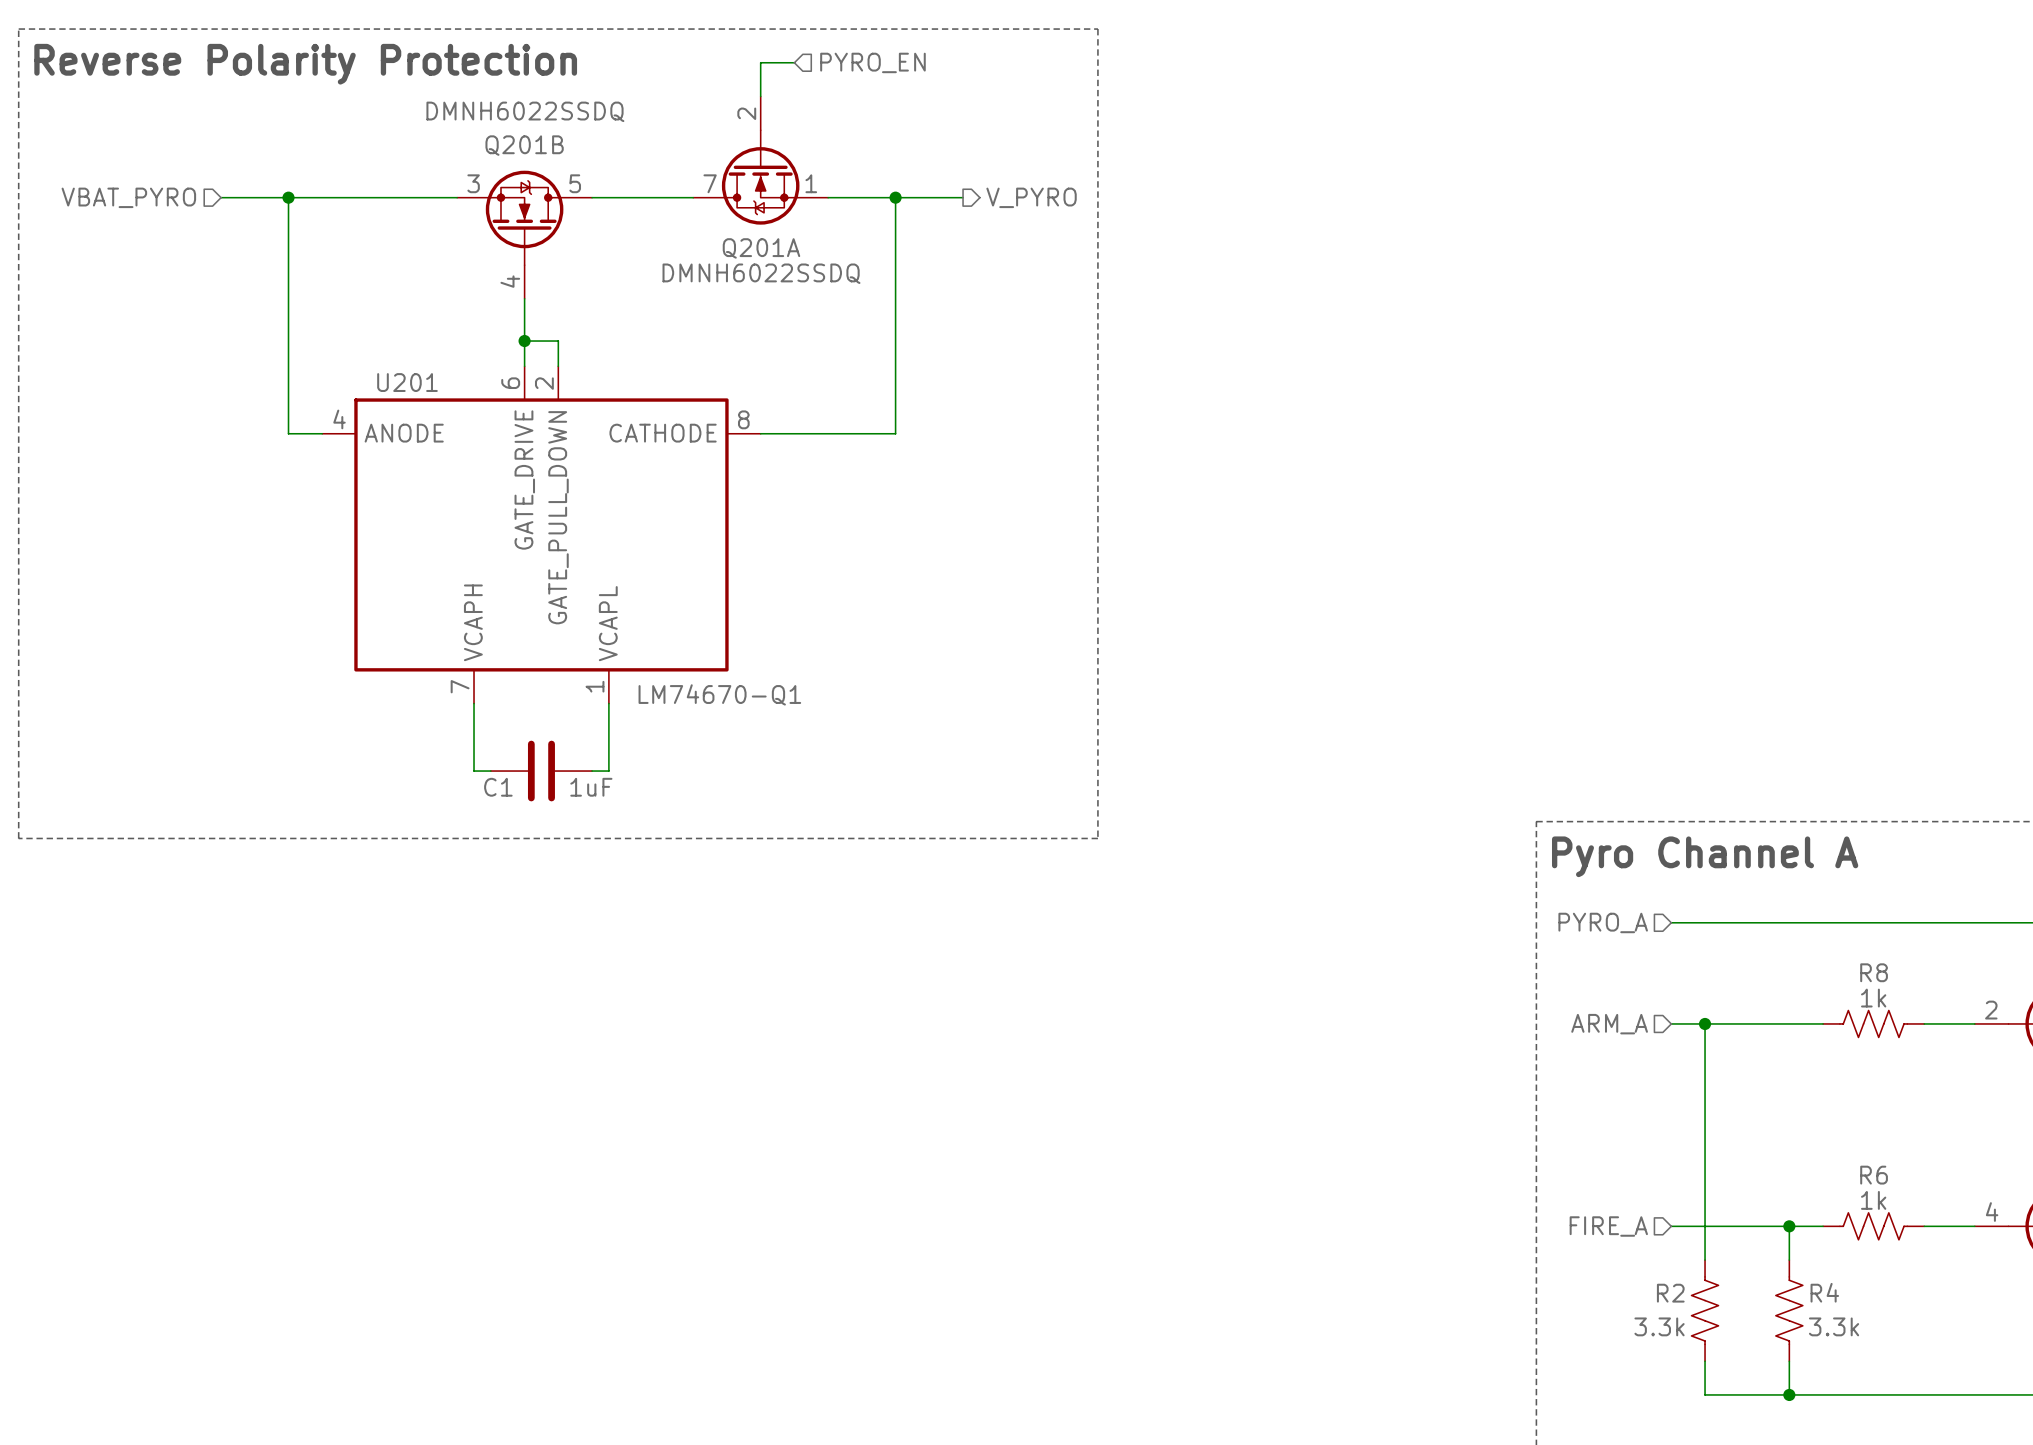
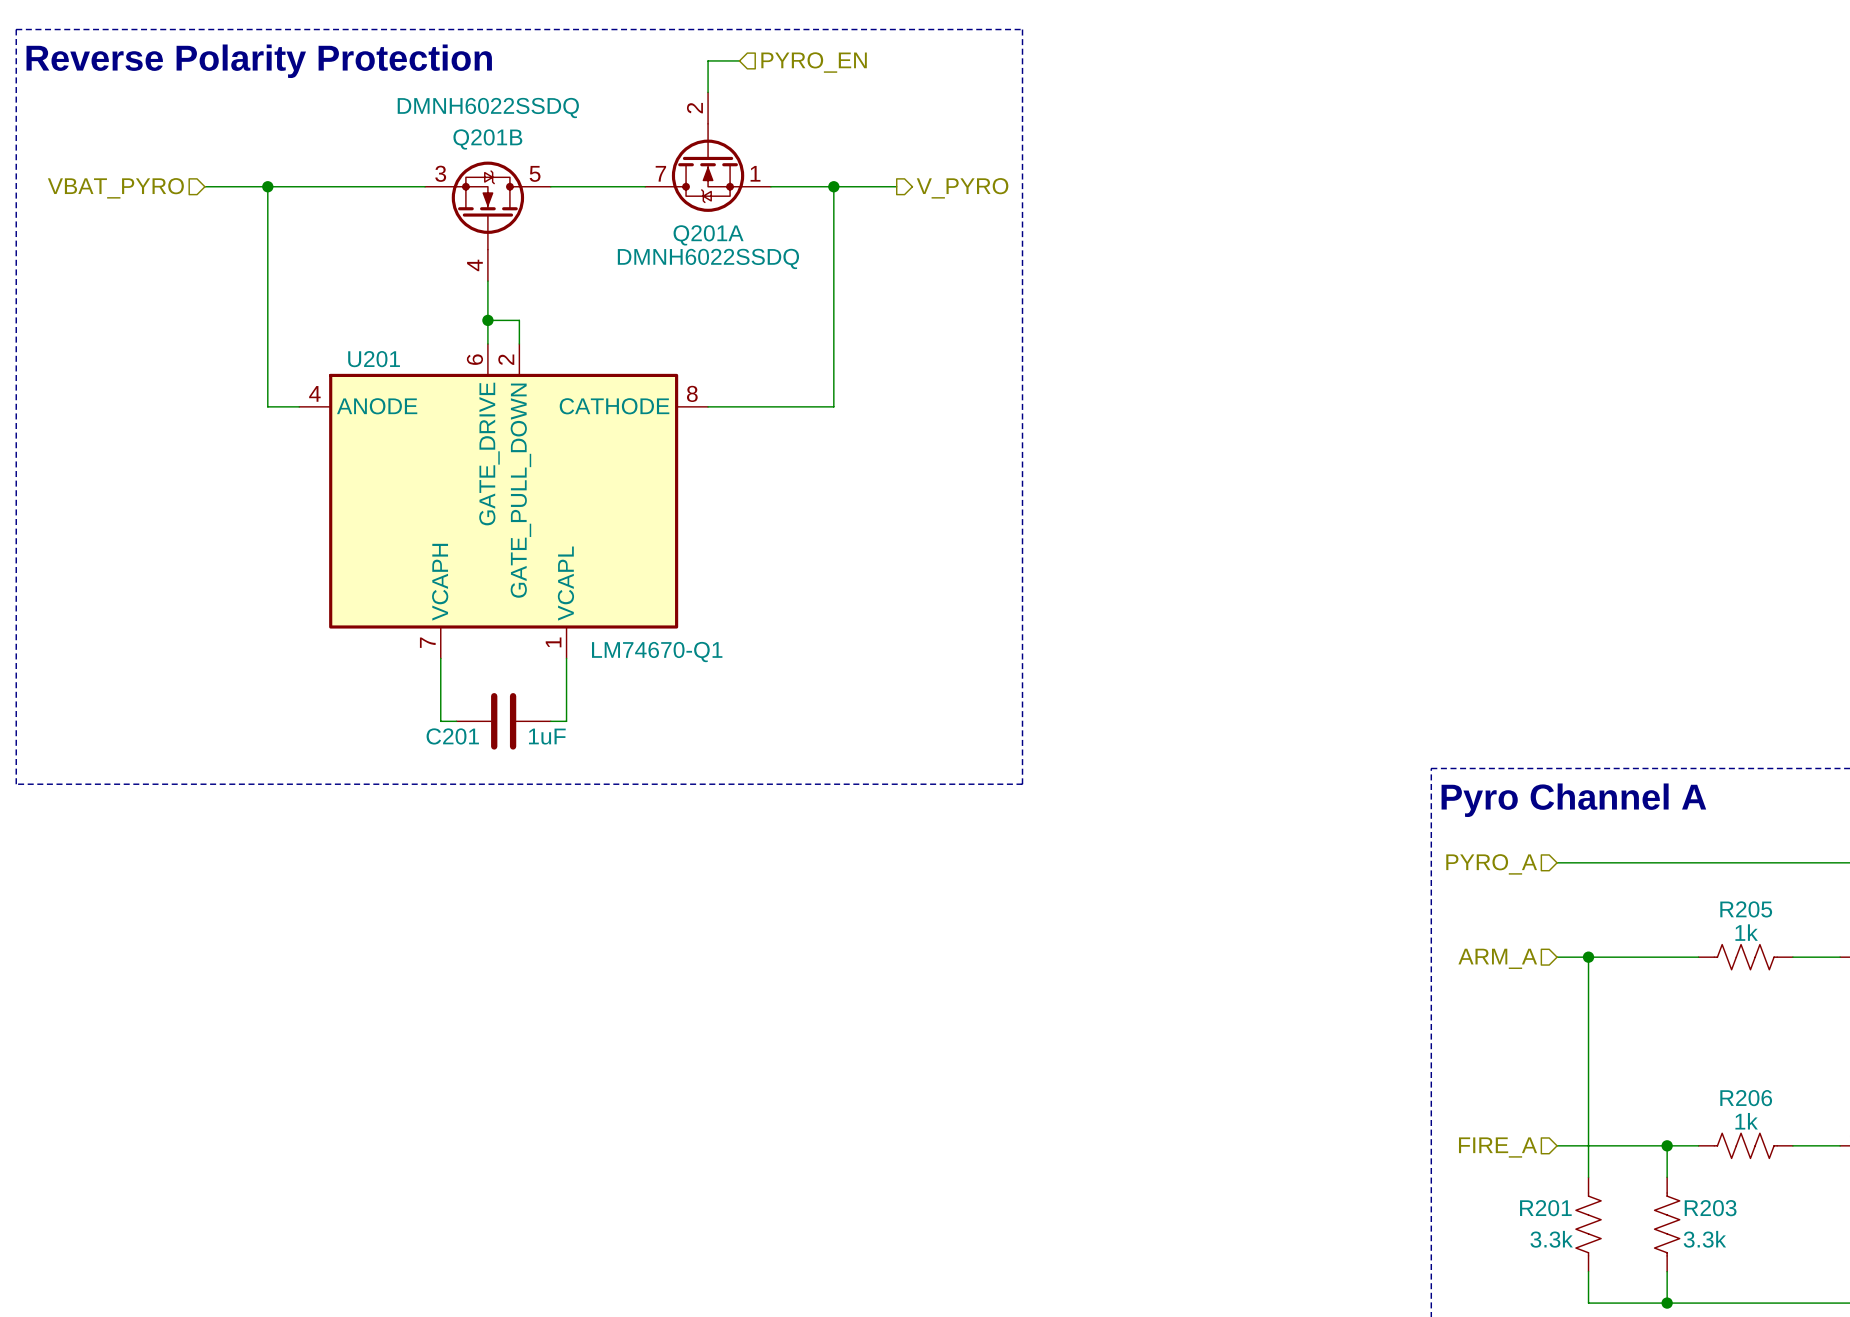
C1 name: C1 (498, 787) -> C201 (452, 736)
R8 name: R8 (1874, 972) -> R205 (1746, 909)
R6 name: R6 (1874, 1175) -> R206 (1746, 1098)
R4 name: R4 (1824, 1292) -> R203 (1710, 1208)
R2 name: R2 (1670, 1293) -> R201 (1545, 1208)

